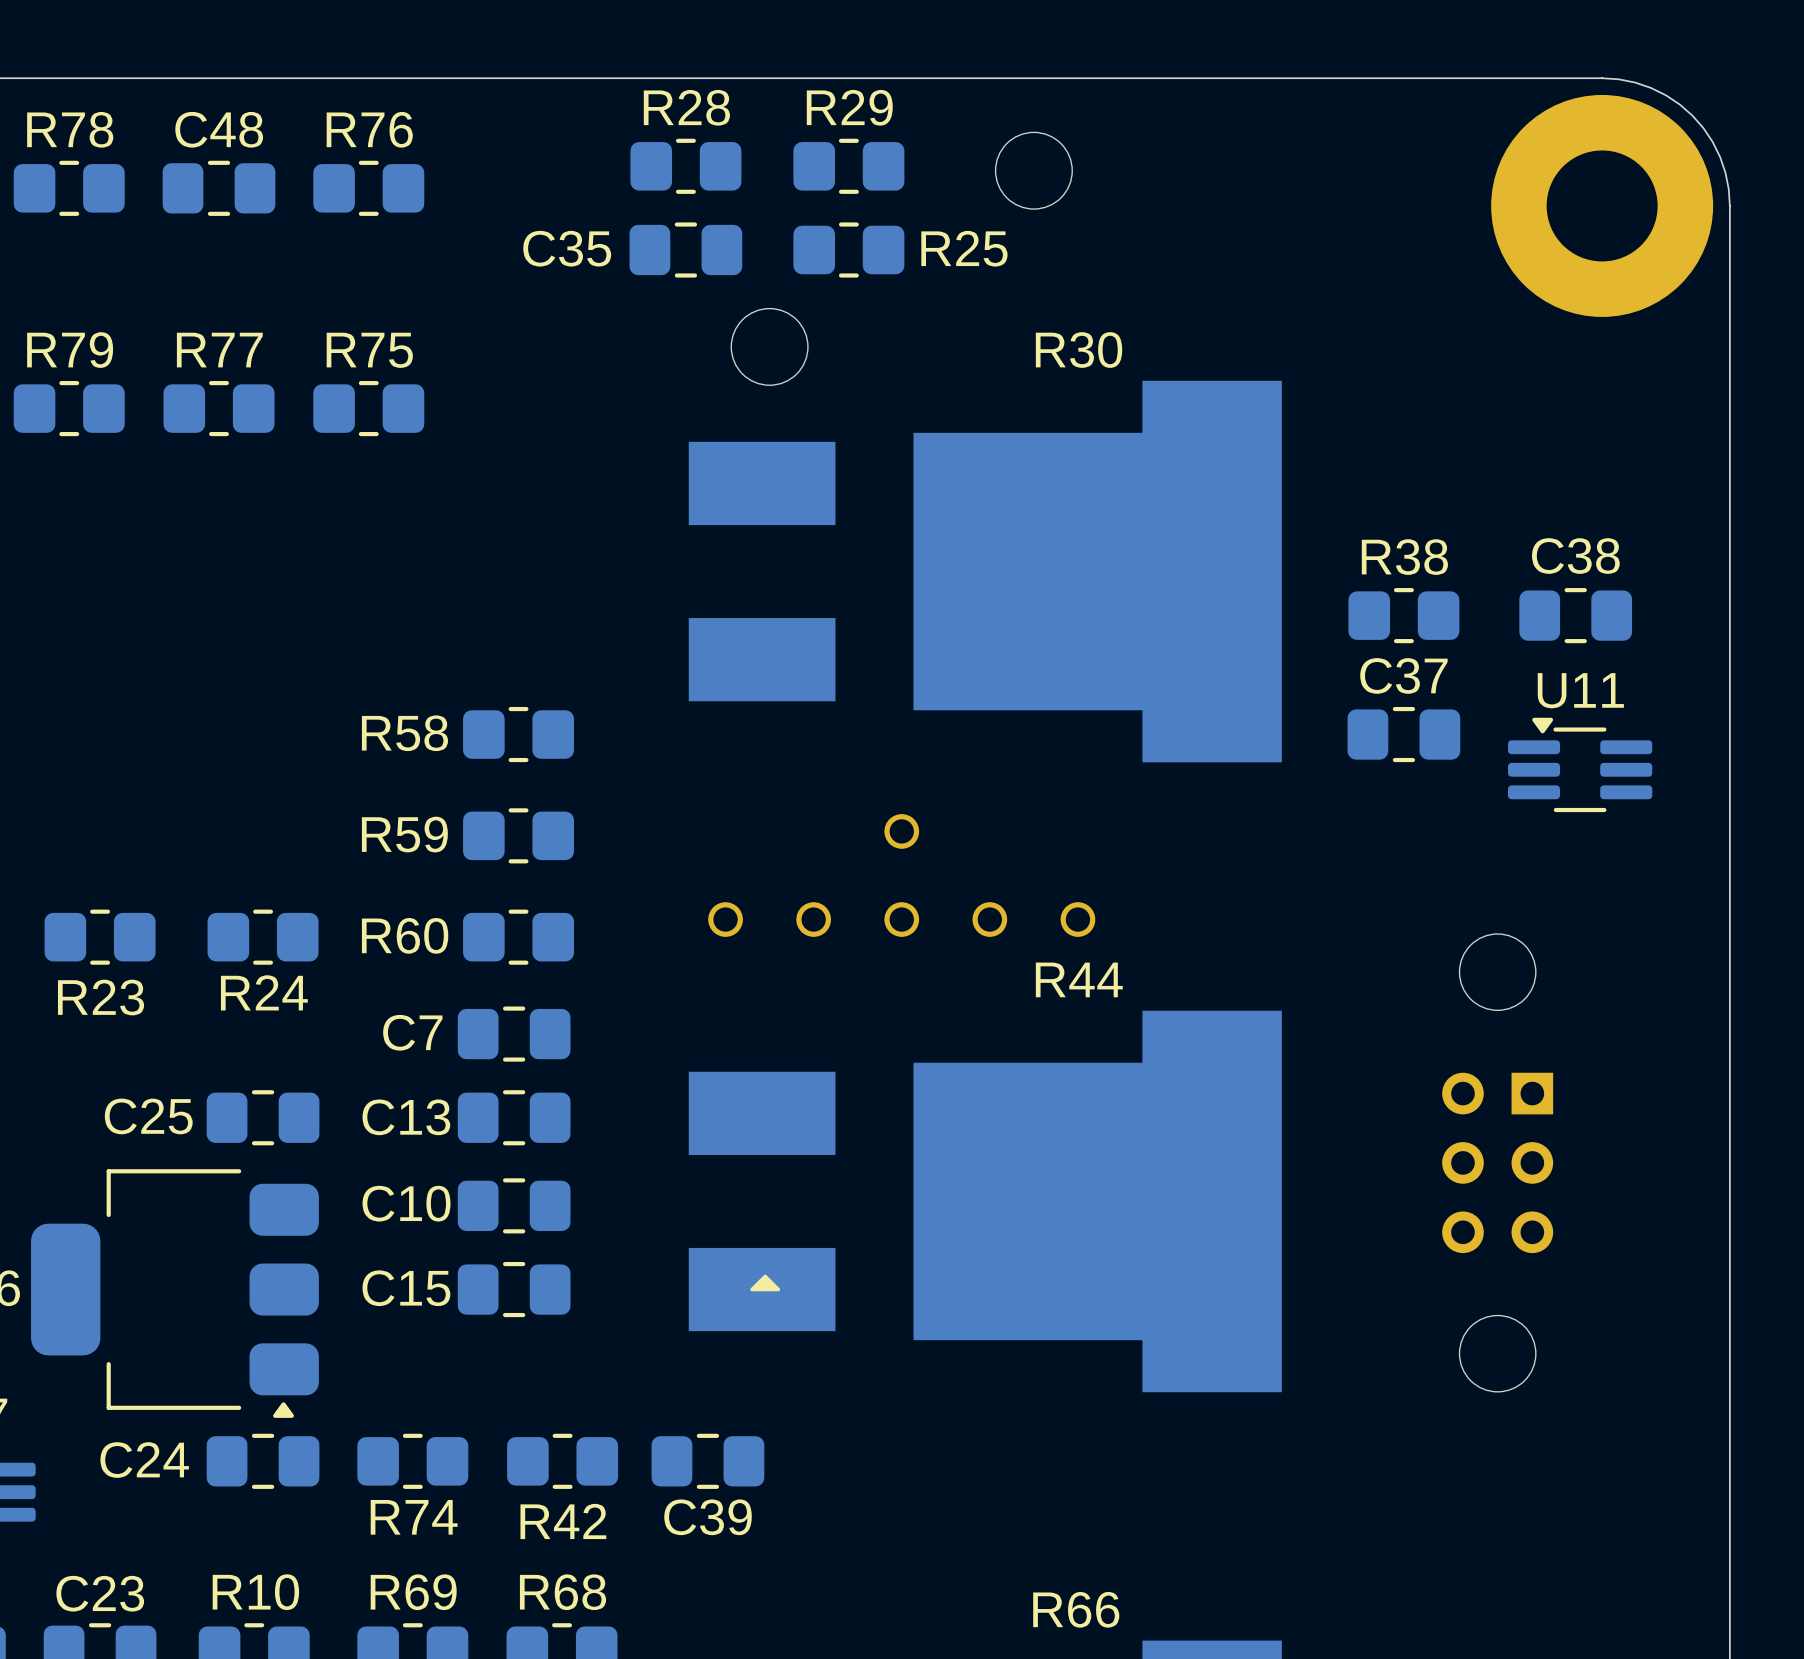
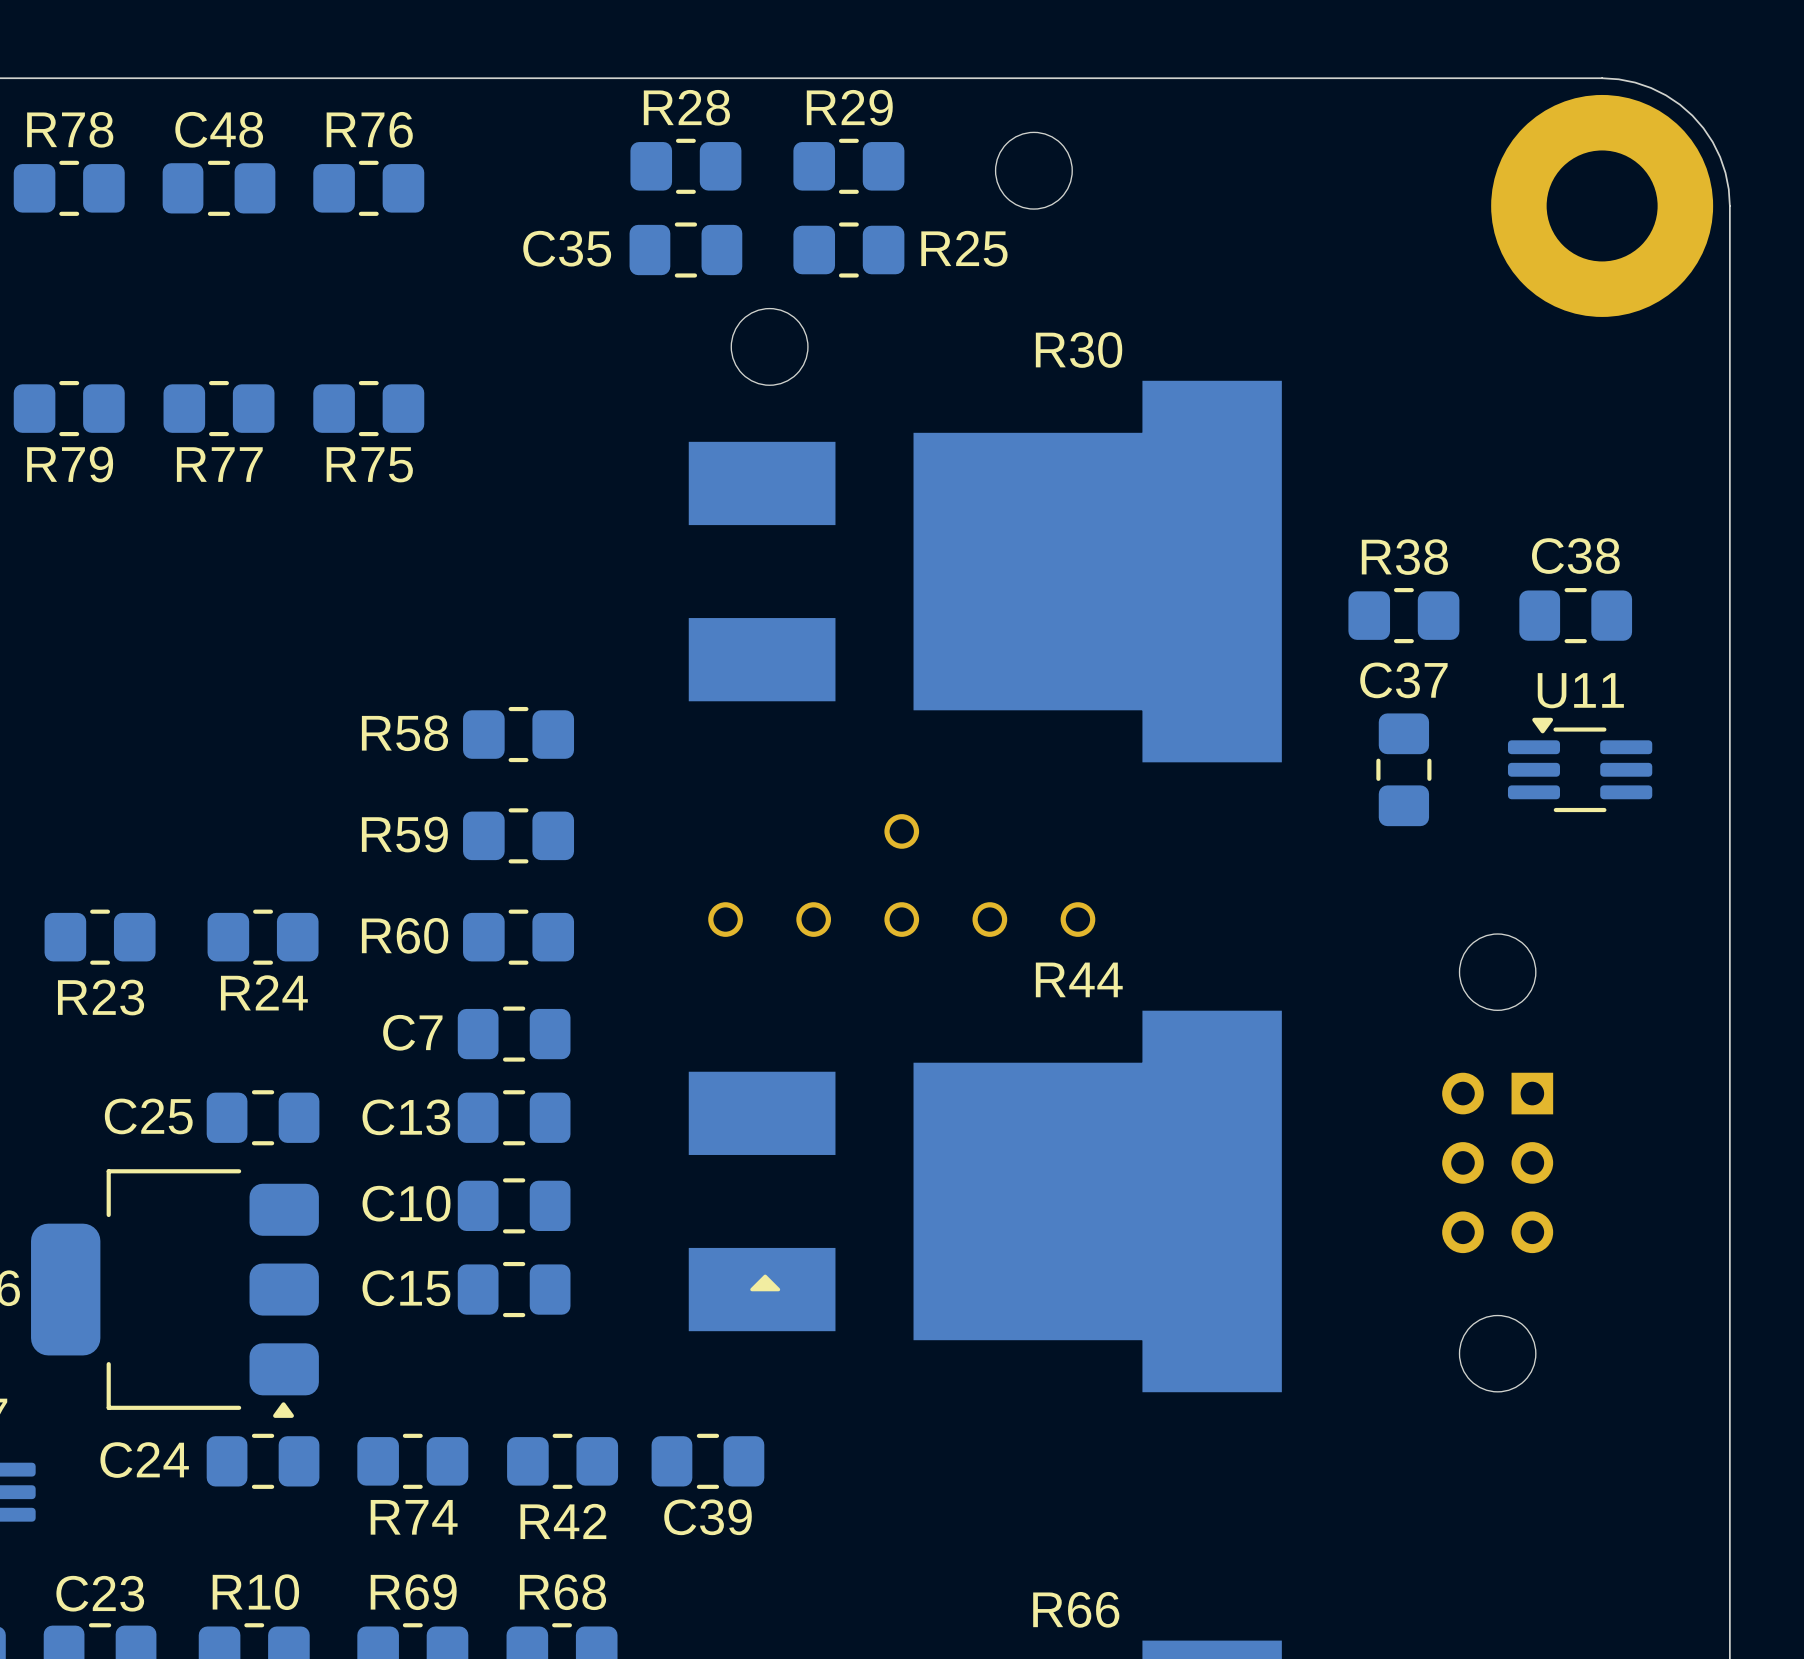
R79 name position: R79 (70, 350) -> R79 (70, 464)
R77 name position: R77 (219, 350) -> R77 (219, 464)
R75 name position: R75 (369, 350) -> R75 (369, 464)
C37 rotation: 0° (1403, 734) -> 90° clockwise (1403, 769)

